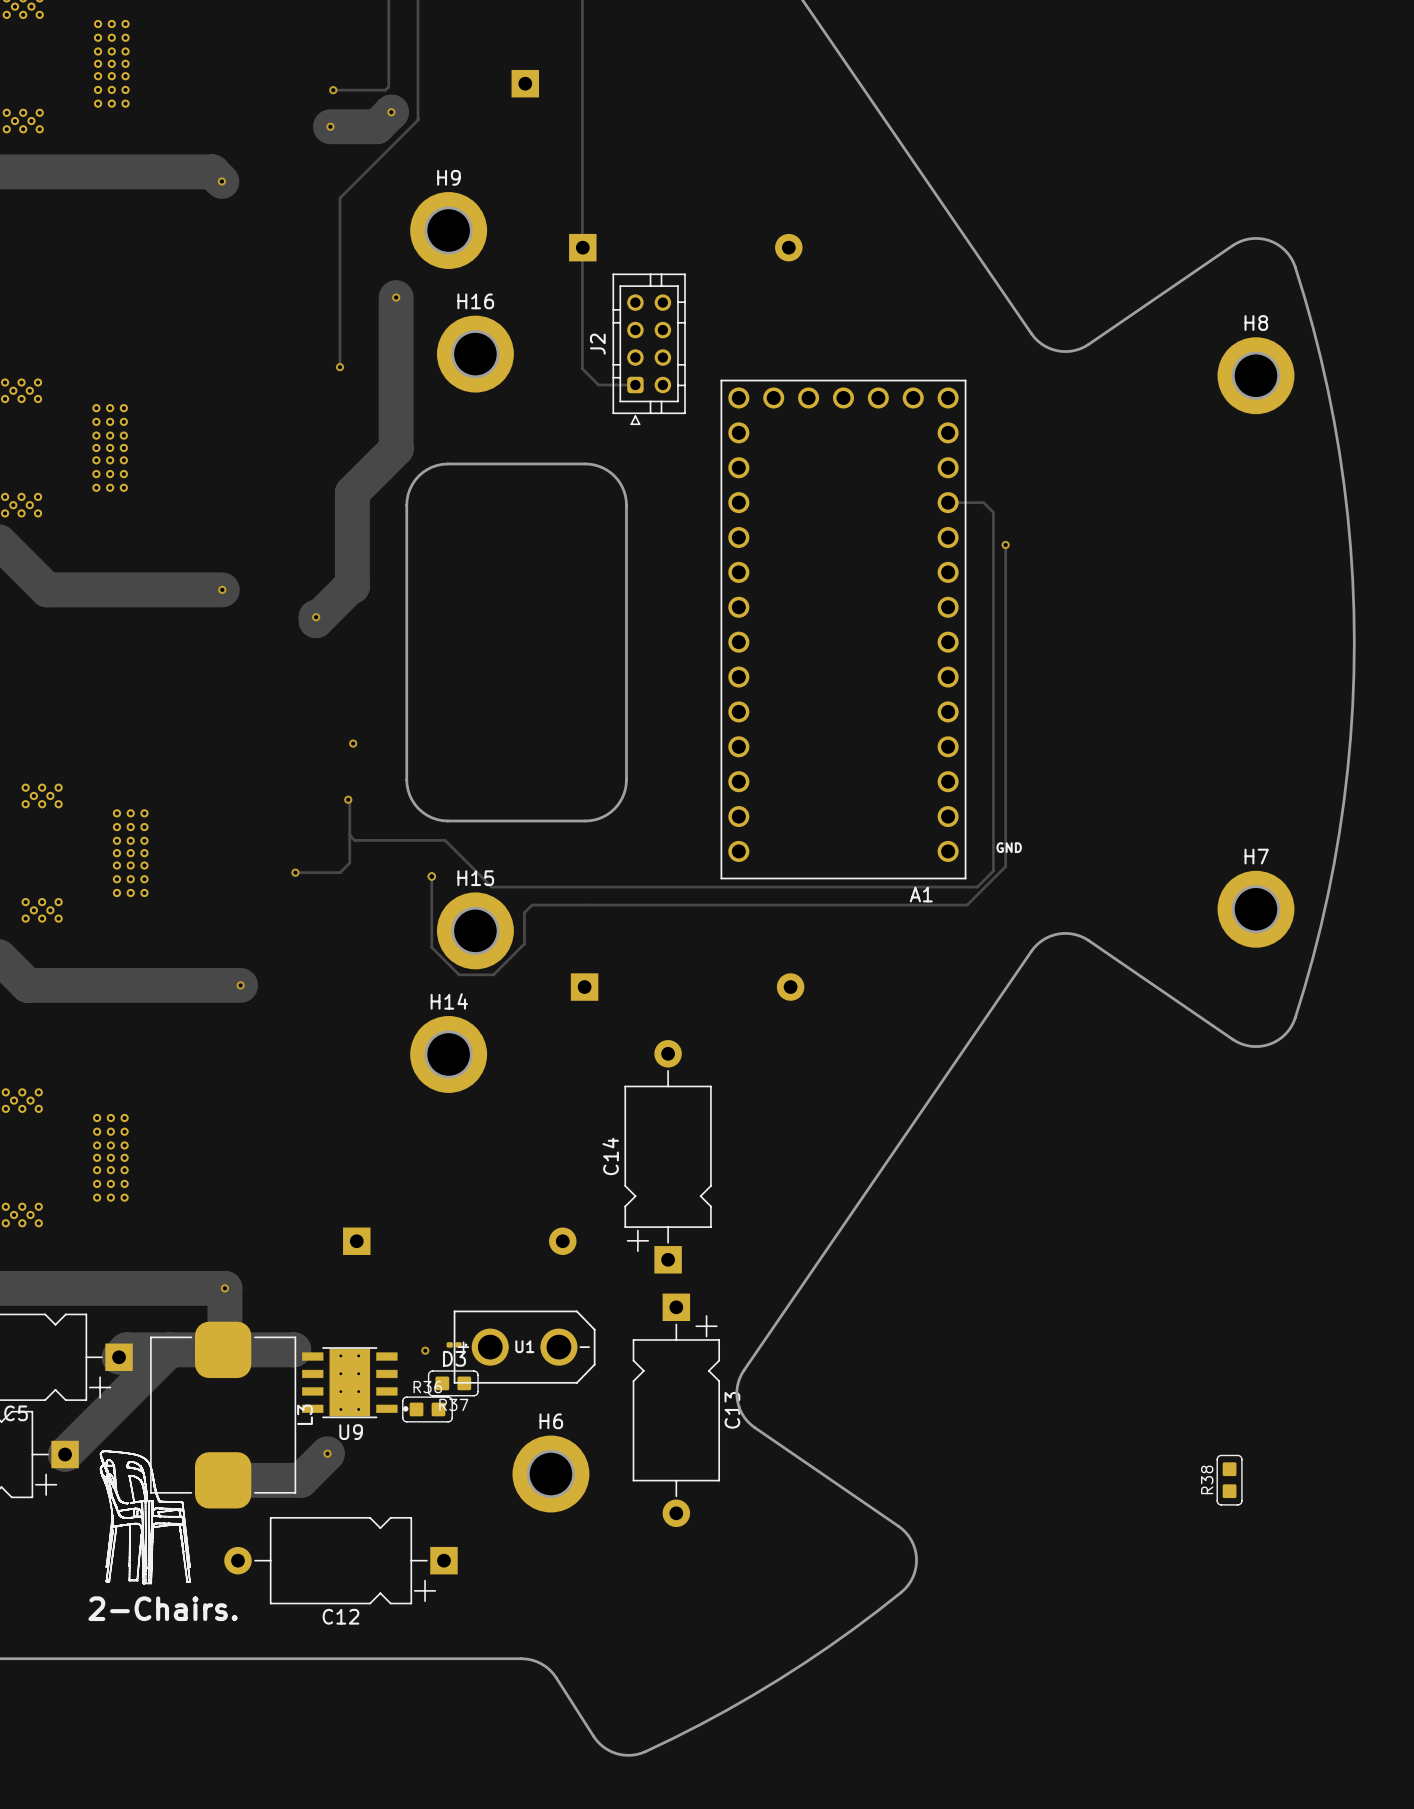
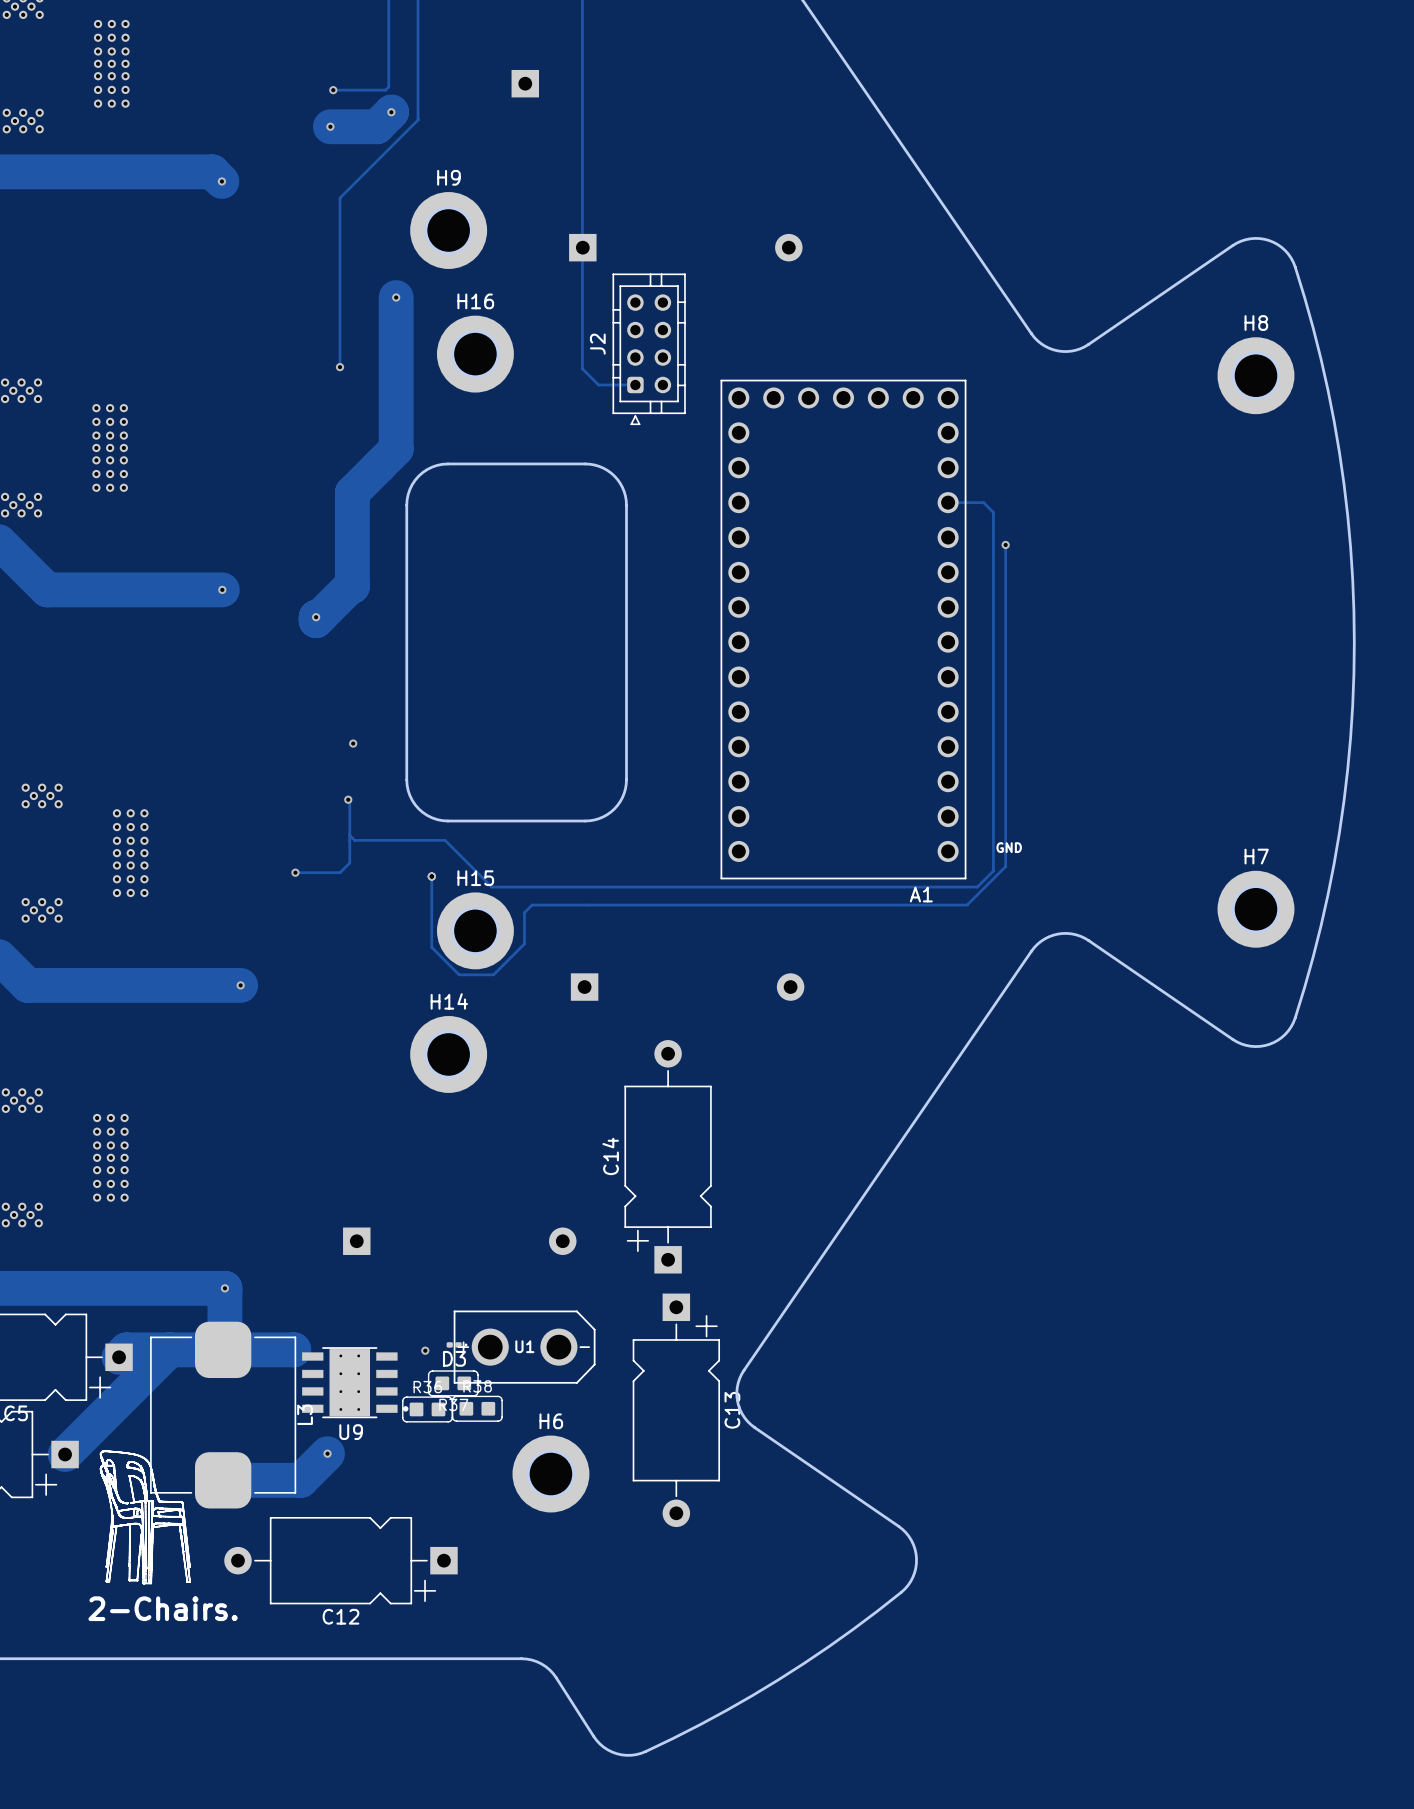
R38 rotation: 0° (1229, 1480) -> 90° clockwise (477, 1408)
R38 position: (1229, 1480) -> (477, 1408)

